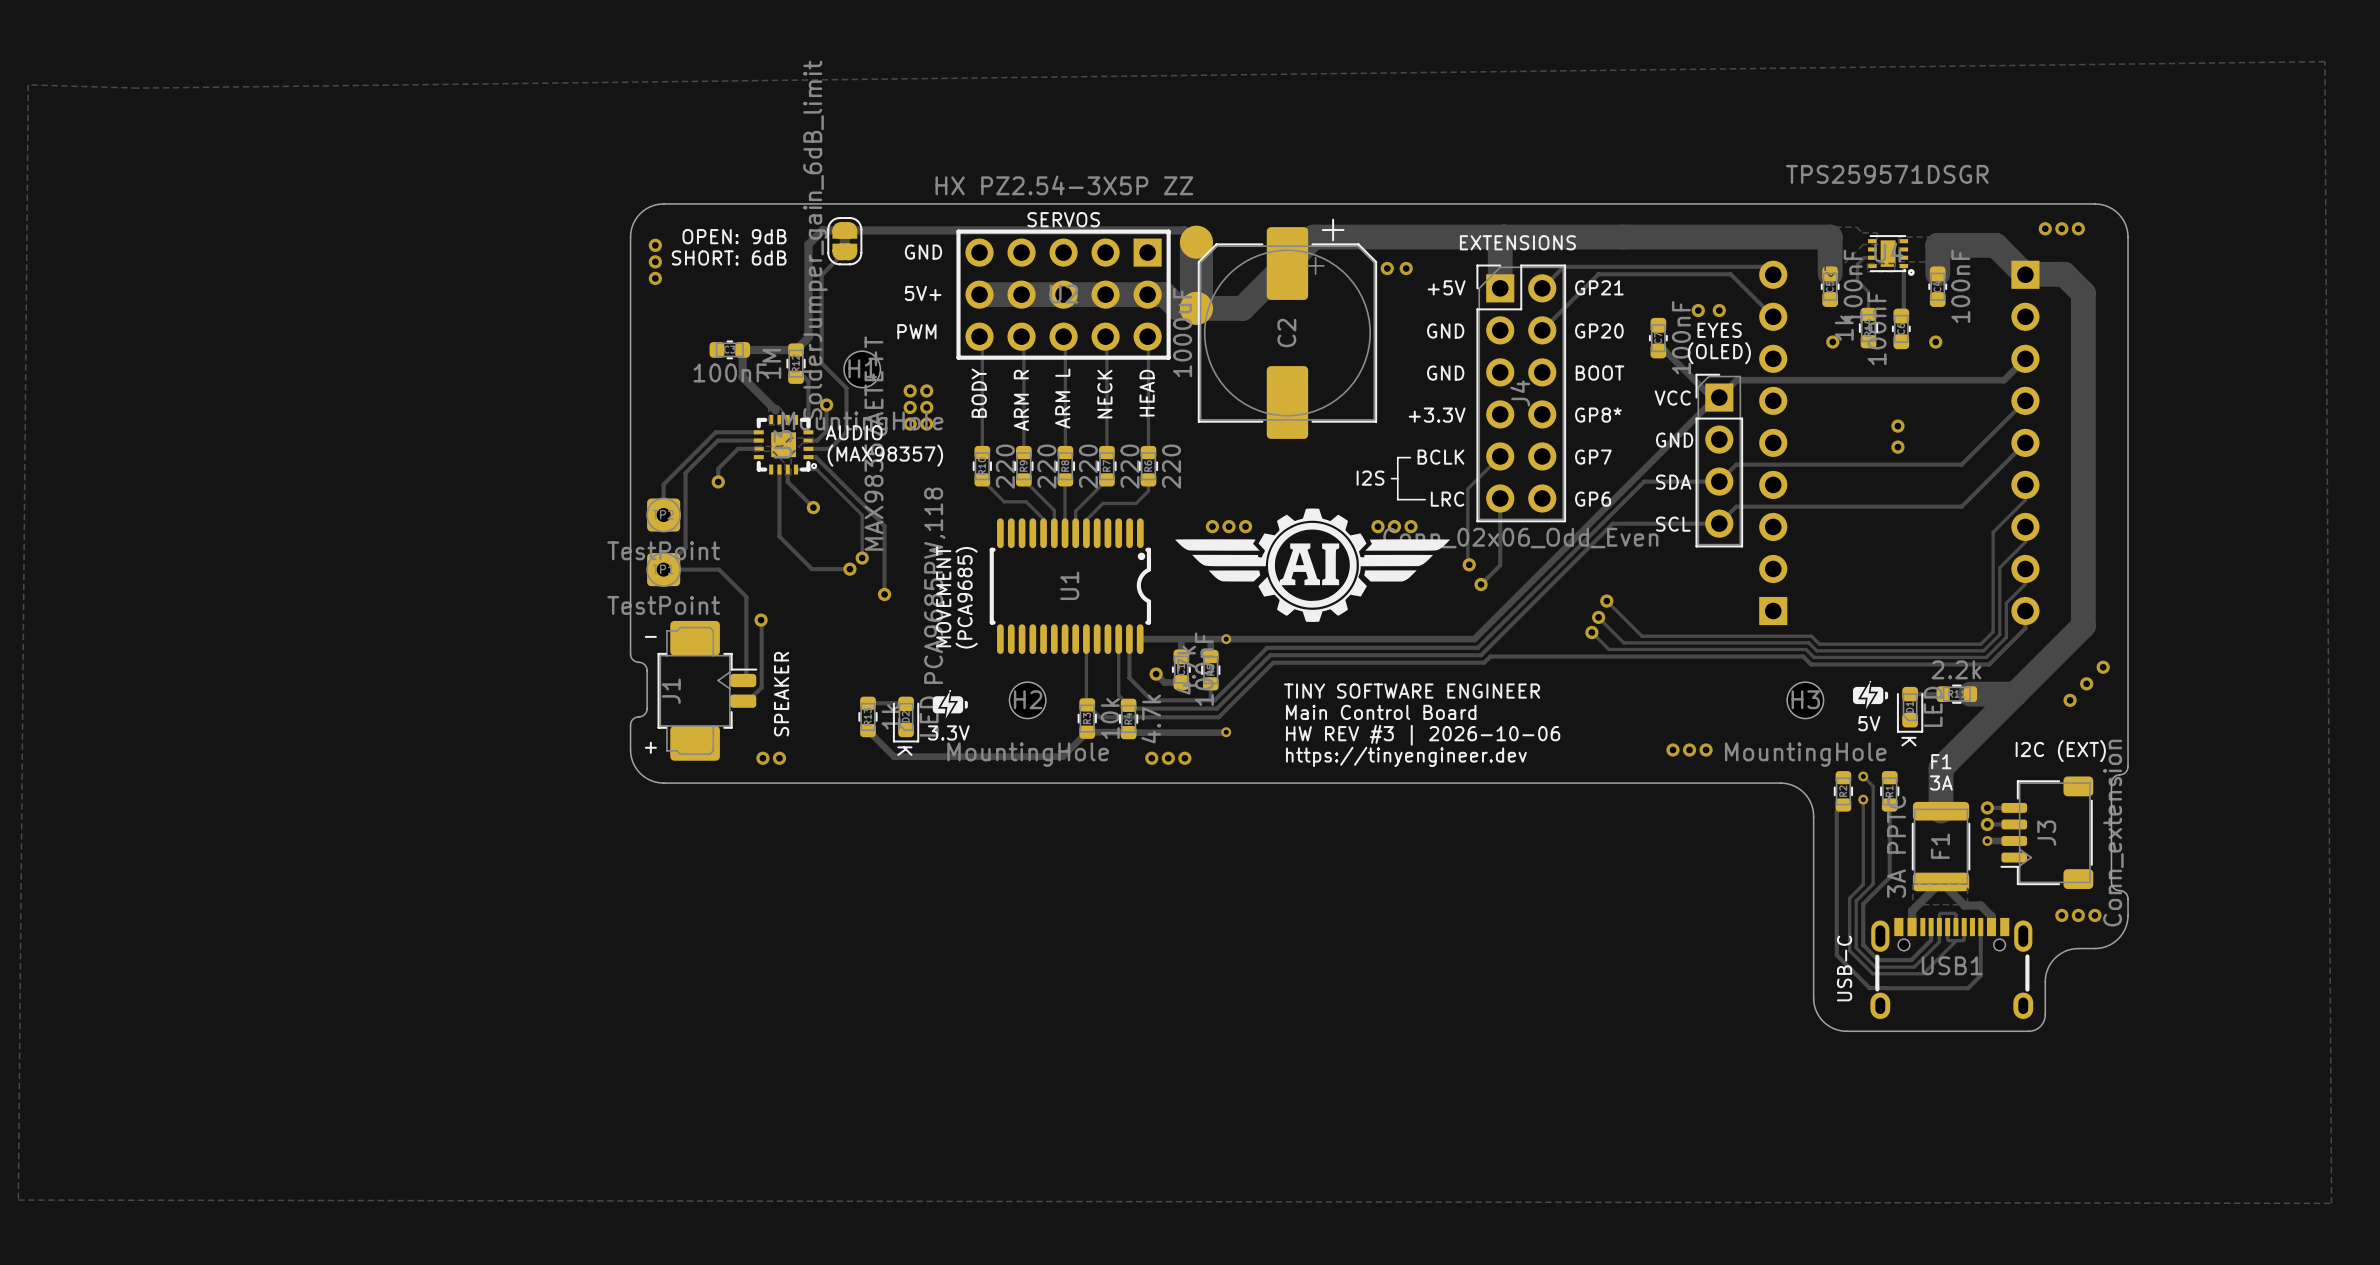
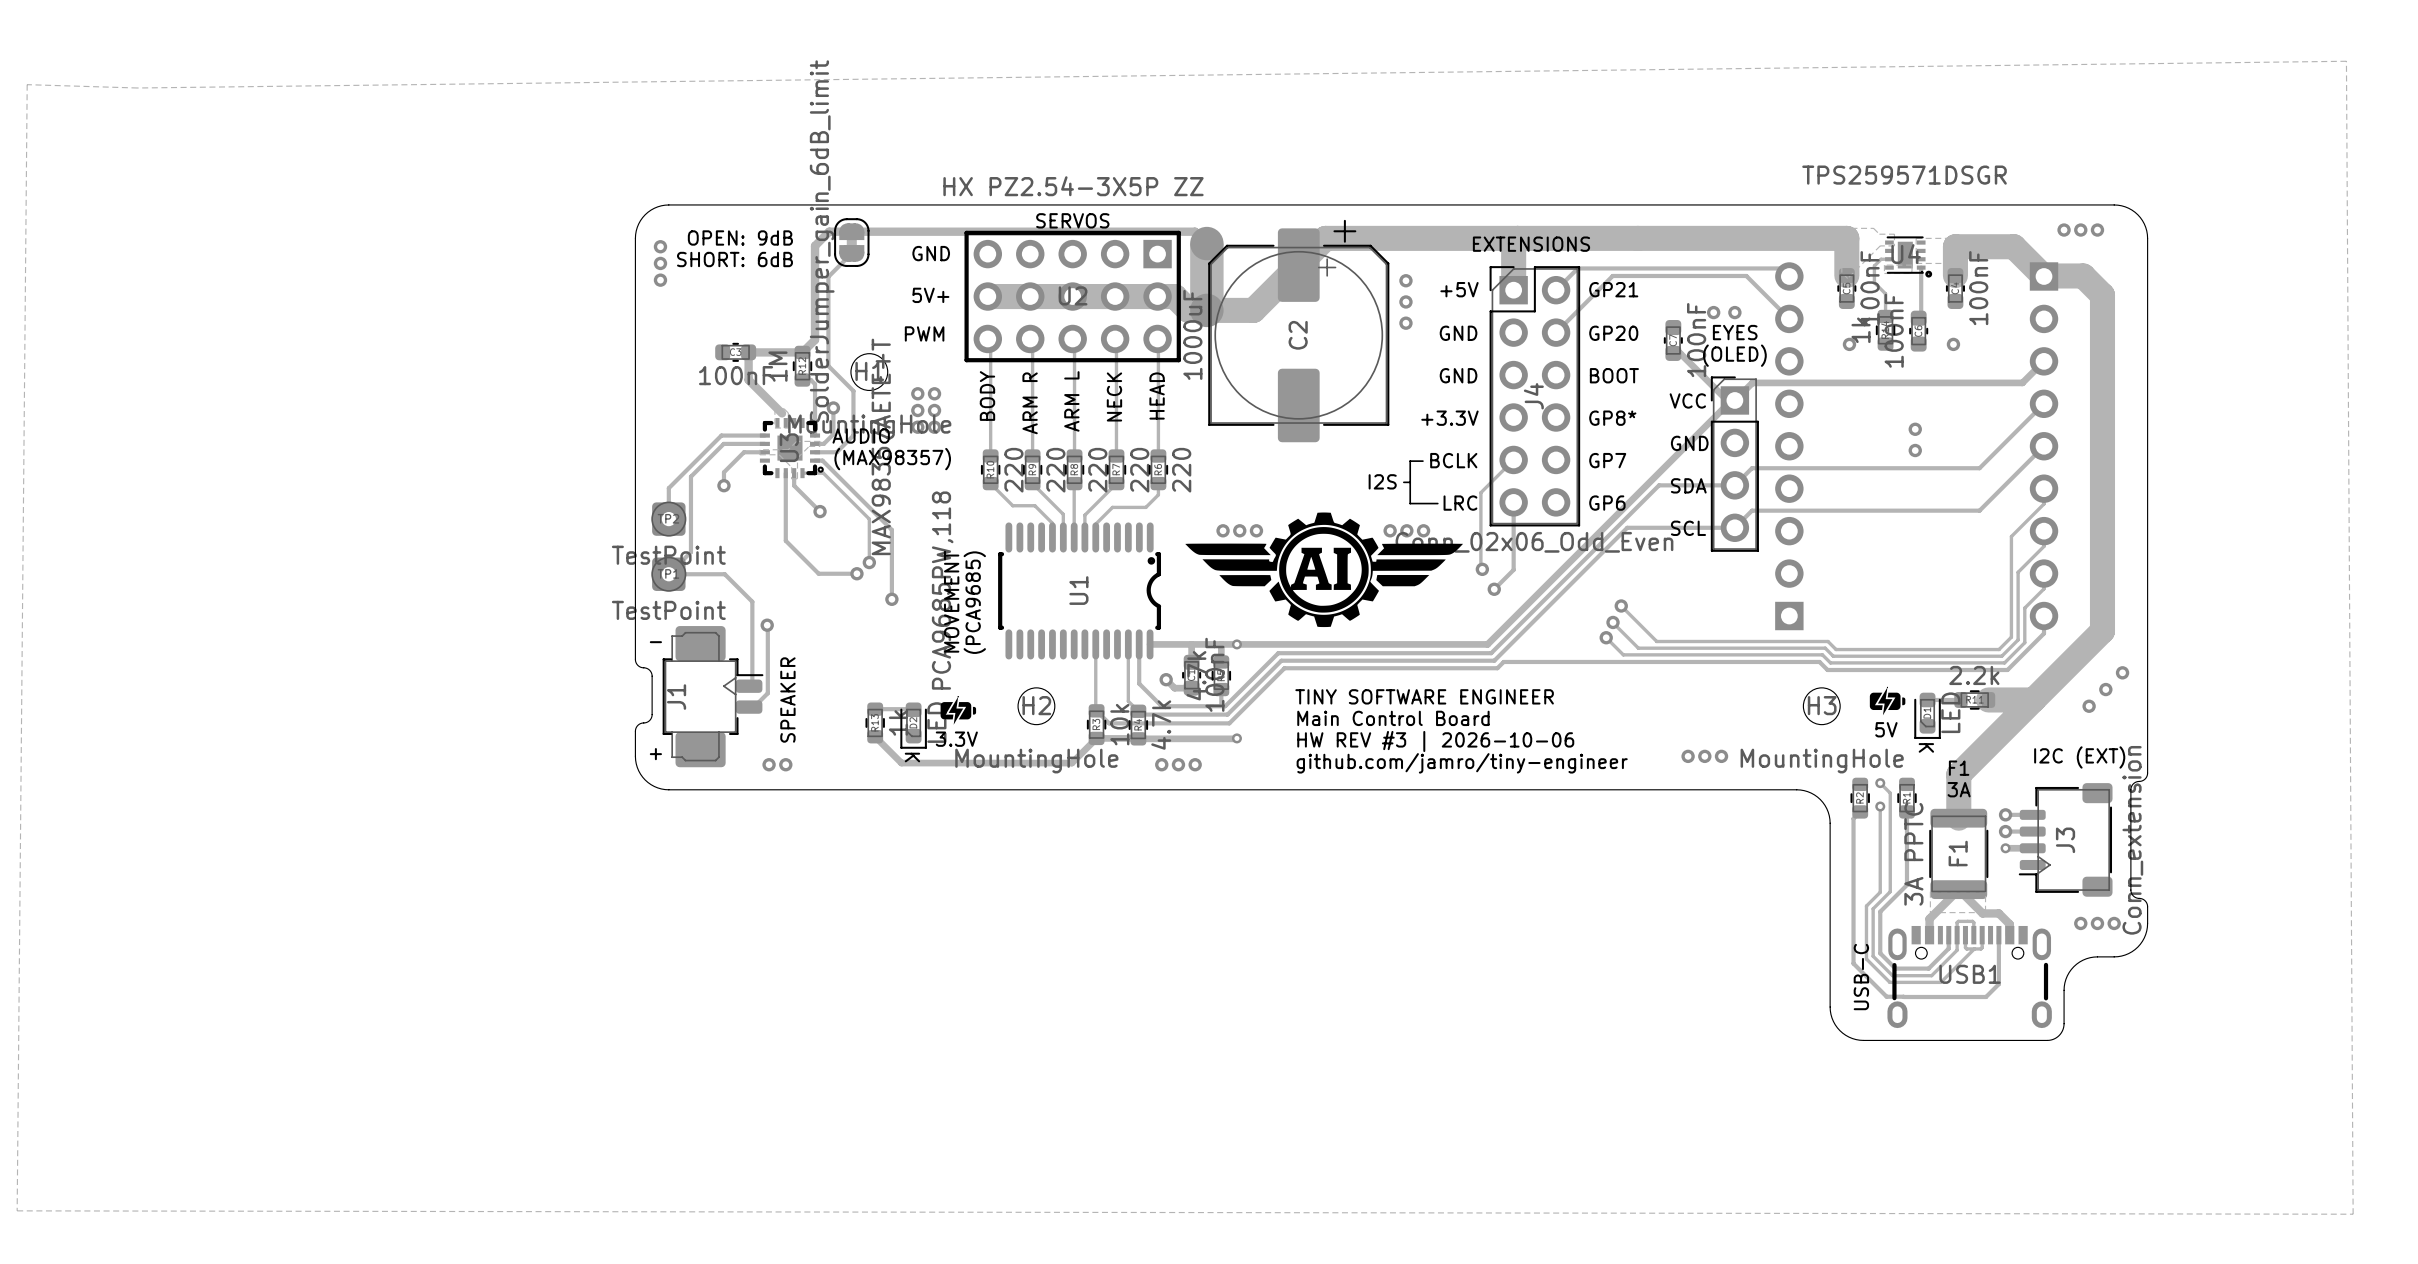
via: (1387, 268) -> none
via: (1406, 268) -> none
via: none -> (1405, 280)
via: none -> (1405, 301)
via: none -> (1405, 323)
text: https://tinyengineer.dev (1406, 756) -> github.com/jamro/tiny-engineer (1462, 763)

